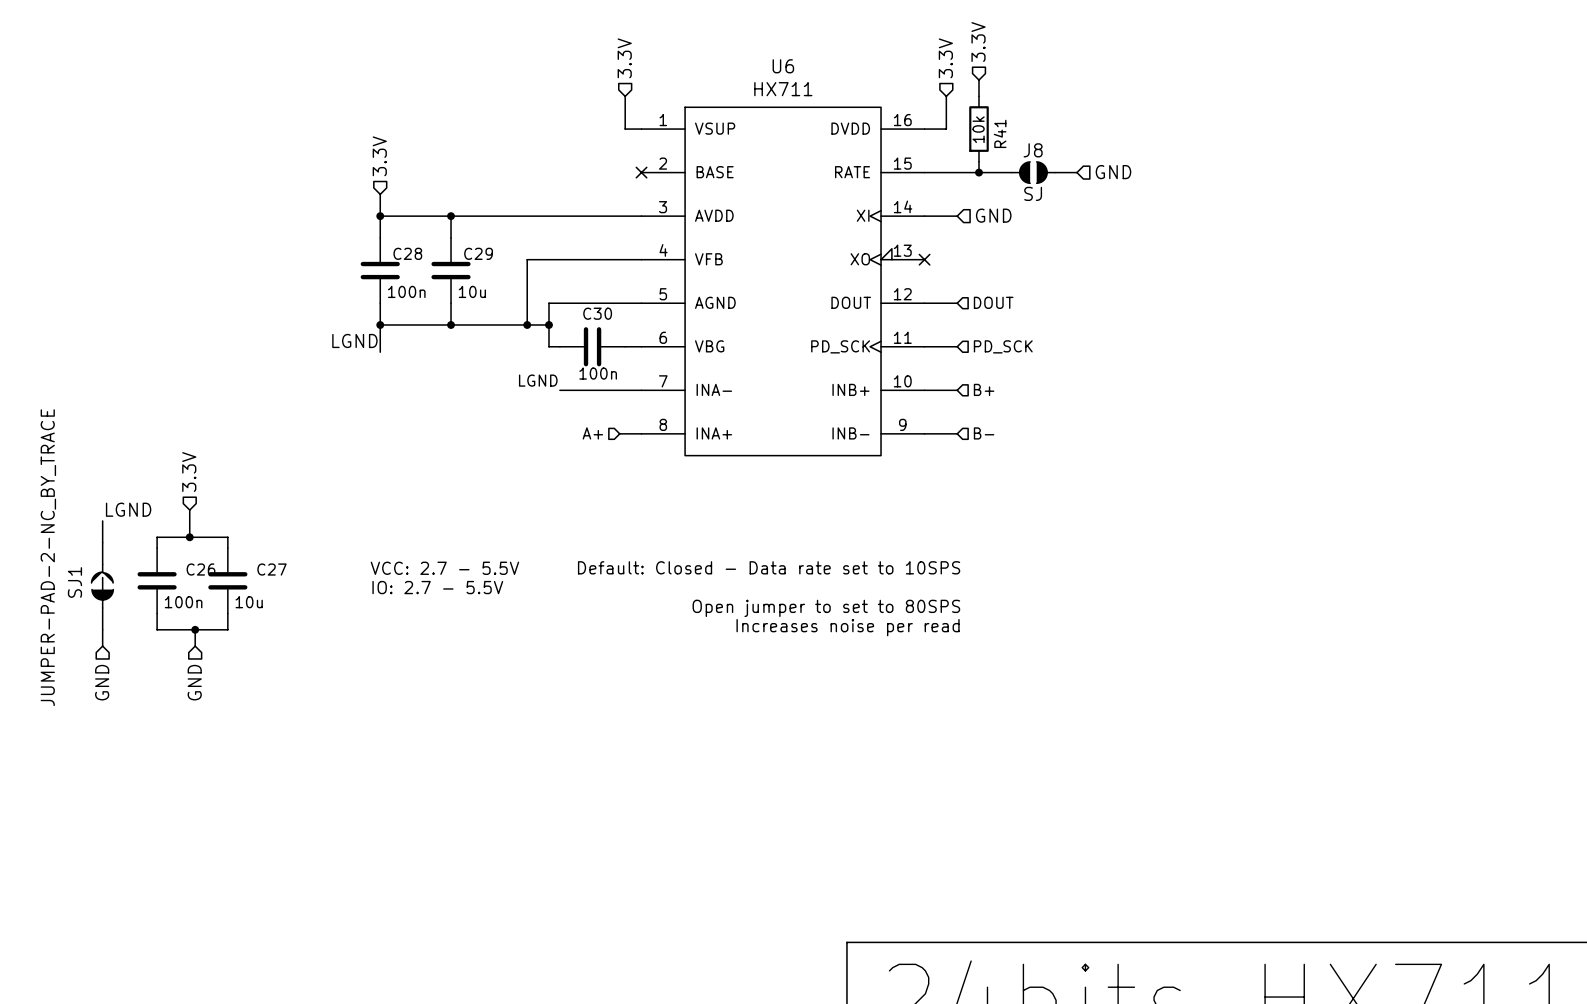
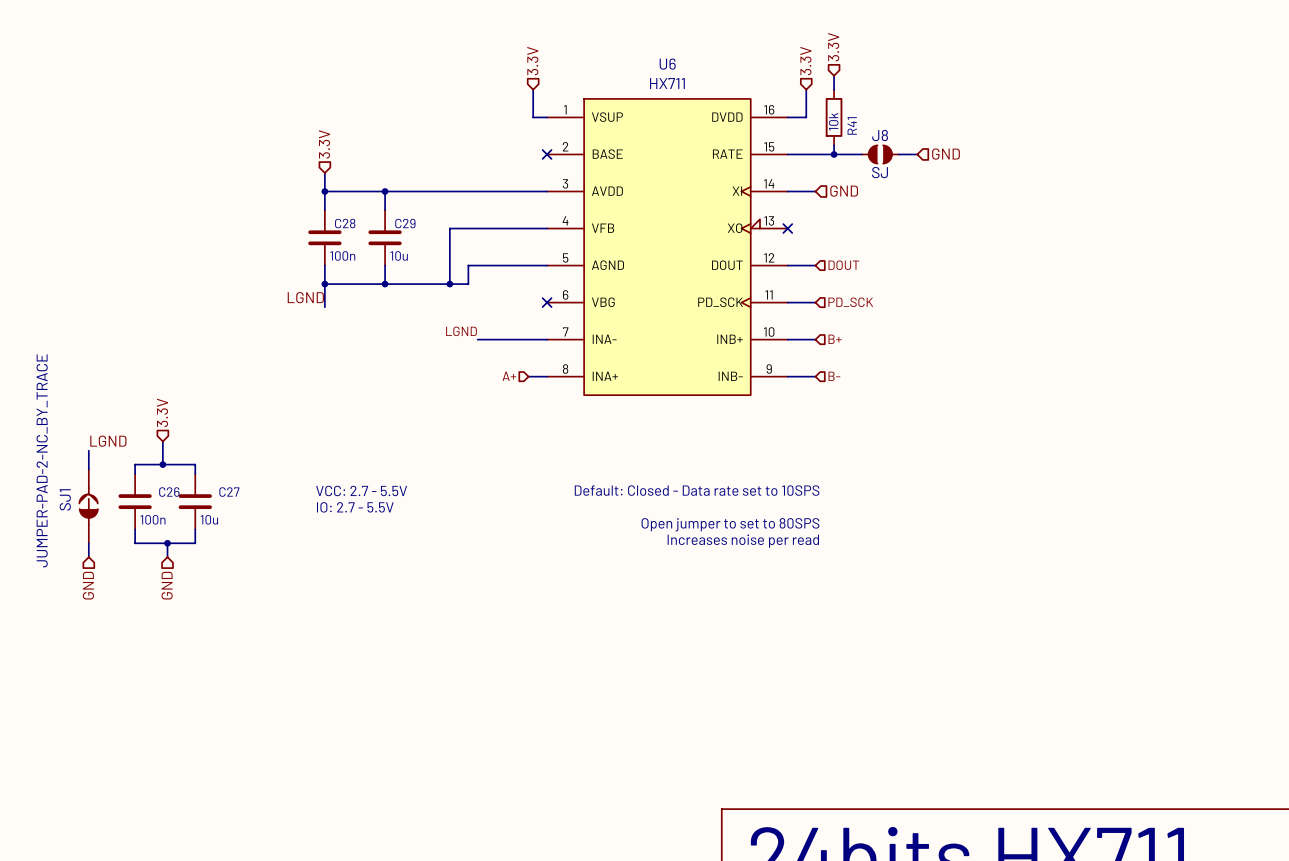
wire: (548, 324) (548, 346) (559, 346) -> none
junction: (548, 324) -> none
C30: 100n (592, 346) -> none
wire: (625, 346) (641, 346) -> none
no-connect mark: none -> (547, 302)

